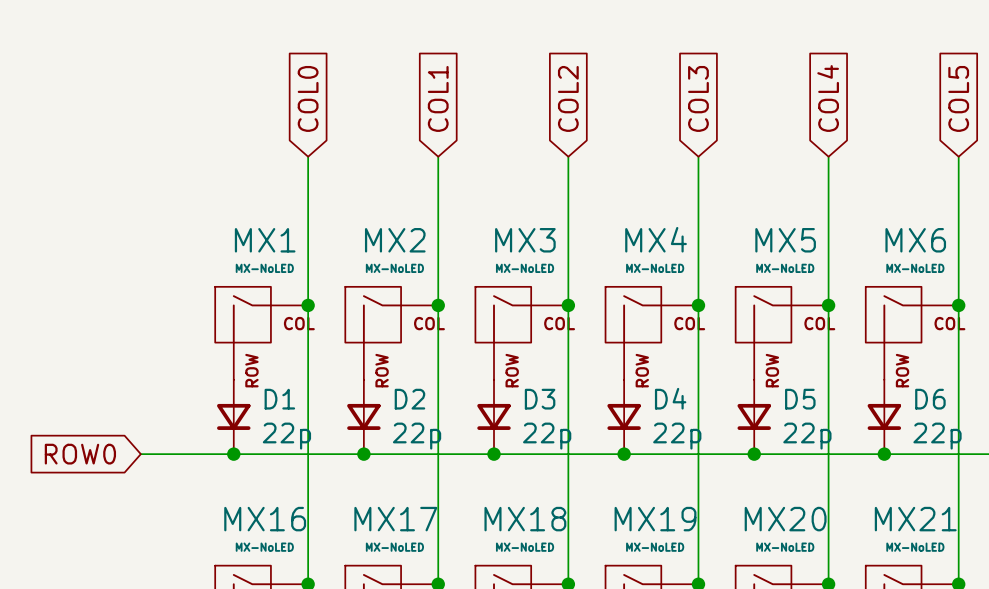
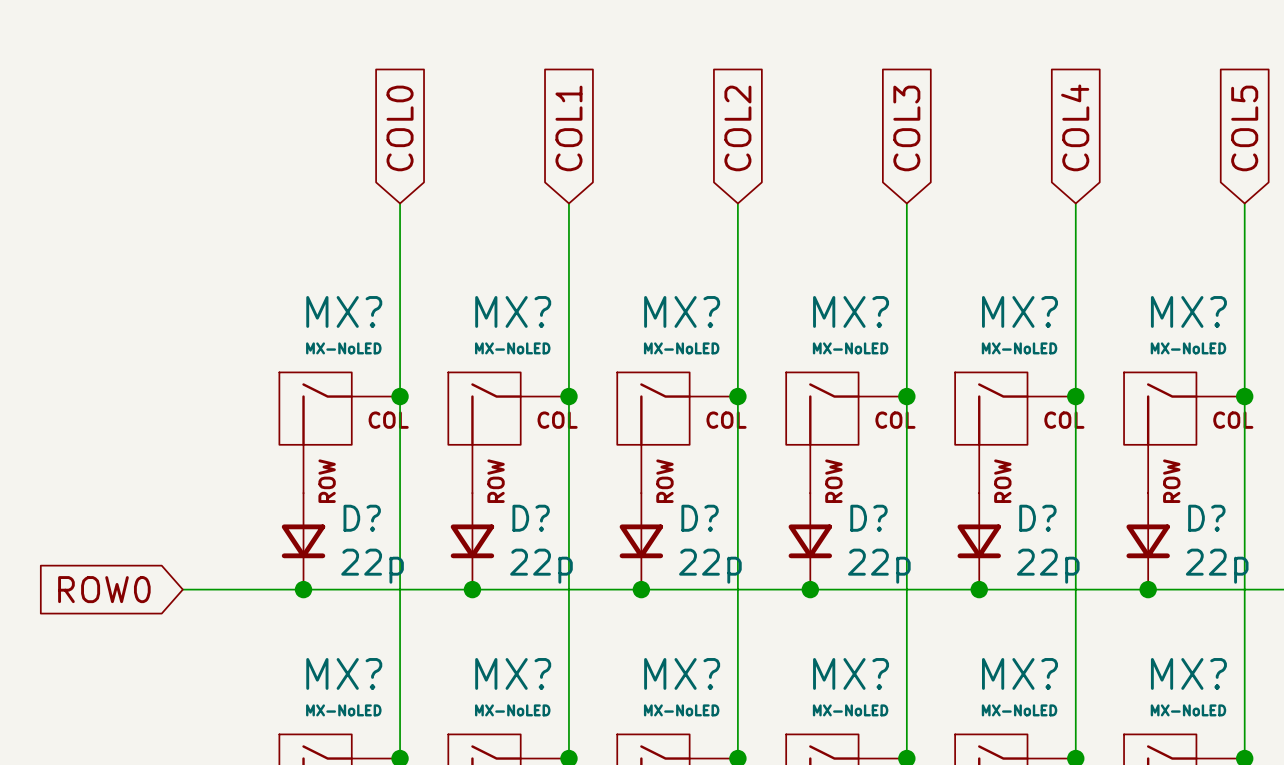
MX4 name: MX4 (656, 239) -> MX? (851, 311)
MX1 name: MX1 (265, 240) -> MX? (344, 311)
MX2 name: MX2 (395, 240) -> MX? (513, 311)
MX3 name: MX3 (525, 240) -> MX? (682, 311)
MX5 name: MX5 (785, 240) -> MX? (1019, 311)
MX6 name: MX6 (915, 240) -> MX? (1188, 311)
D4 name: D4 (670, 398) -> D? (868, 518)
D1 name: D1 (279, 399) -> D? (362, 518)
D2 name: D2 (409, 399) -> D? (531, 518)
D3 name: D3 (540, 399) -> D? (700, 518)
D5 name: D5 (800, 399) -> D? (1037, 518)
D6 name: D6 (930, 399) -> D? (1206, 518)
MX16 name: MX16 (265, 519) -> MX? (344, 673)
MX17 name: MX17 (395, 519) -> MX? (513, 673)
MX18 name: MX18 (525, 519) -> MX? (682, 673)
MX19 name: MX19 (655, 519) -> MX? (851, 673)
MX20 name: MX20 (785, 519) -> MX? (1019, 673)
MX21 name: MX21 (915, 519) -> MX? (1188, 673)

